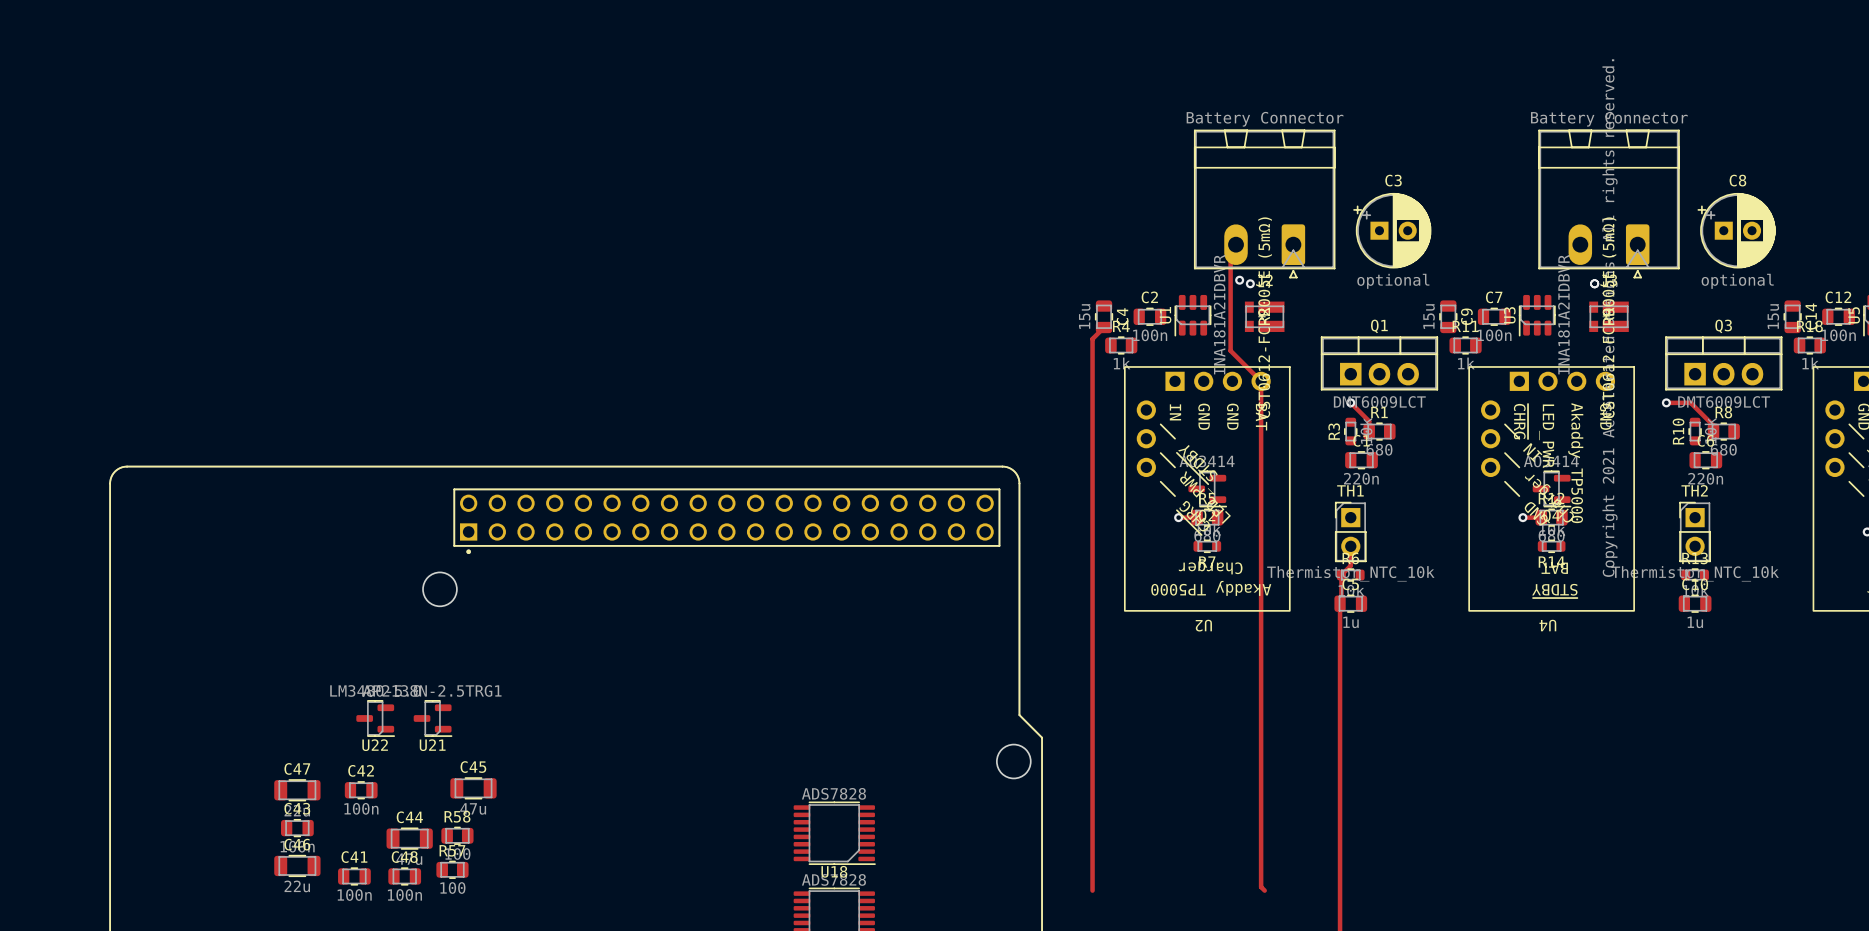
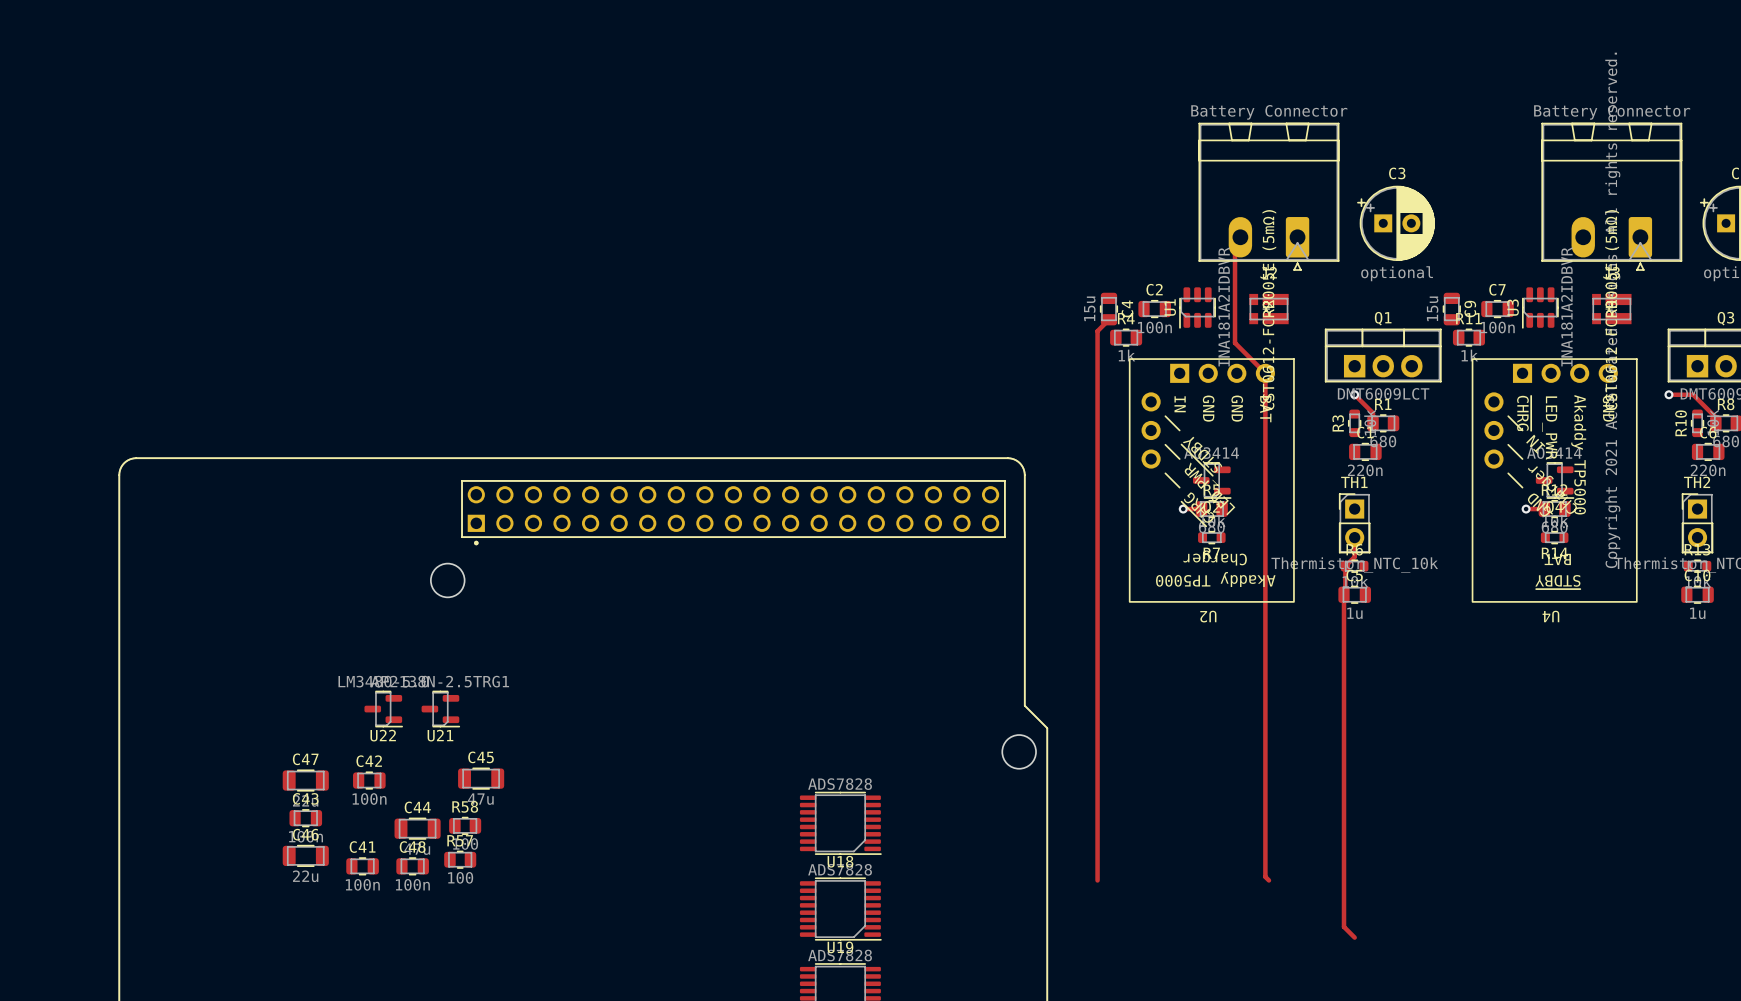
via: (1239, 280) -> none
via: (1250, 283) -> none
via: (1594, 283) -> none

